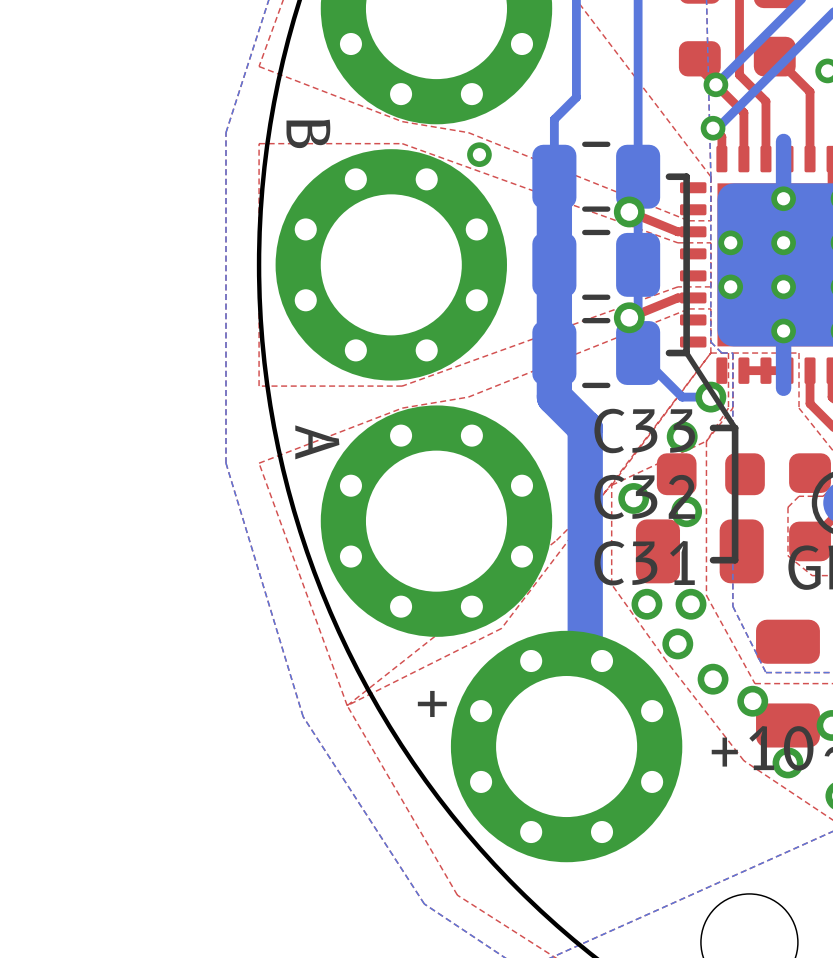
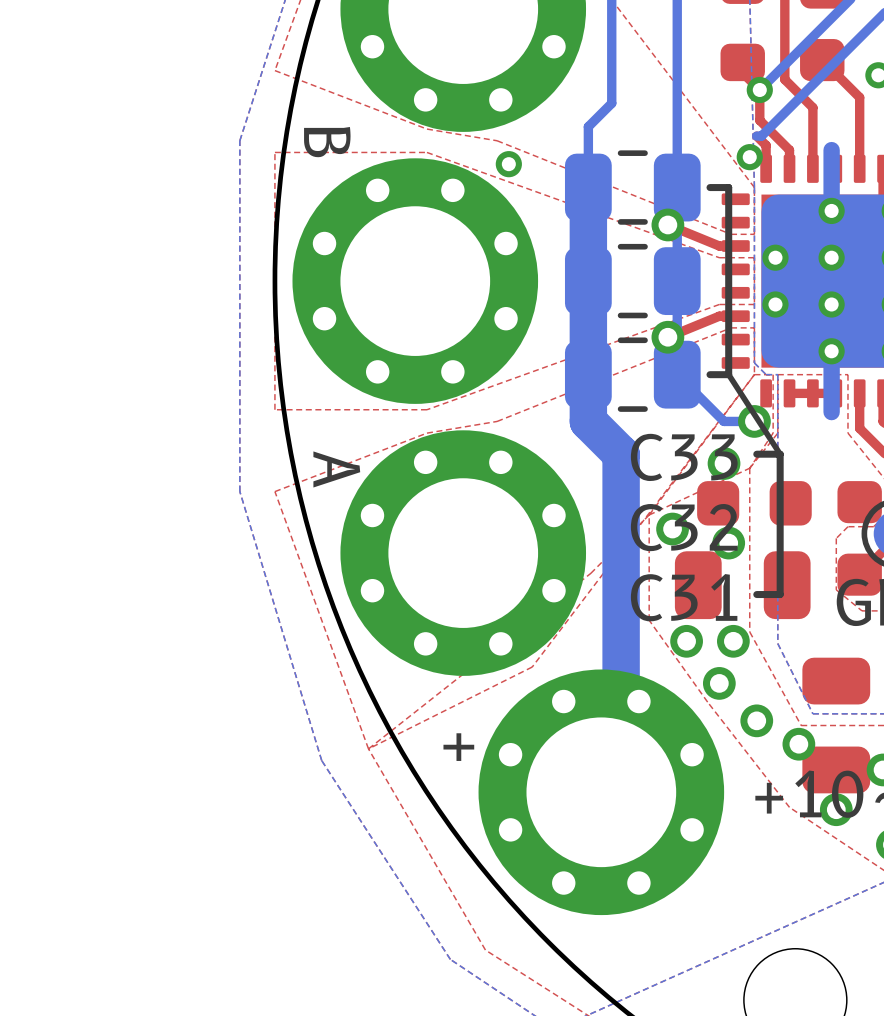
top track: (715, 84) (743, 112) (743, 141) -> (759, 89) (759, 120) (789, 150)
via position: (713, 128) -> (749, 157)

